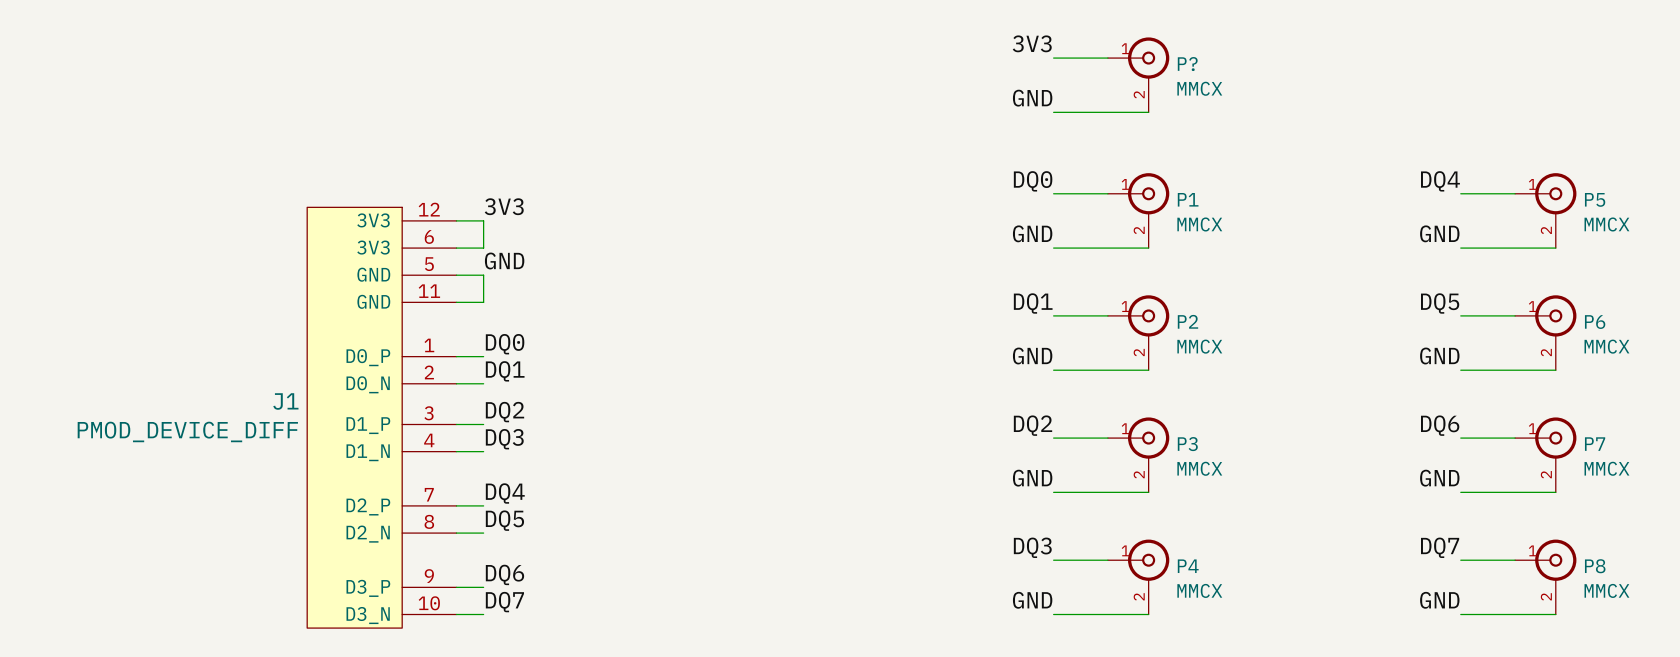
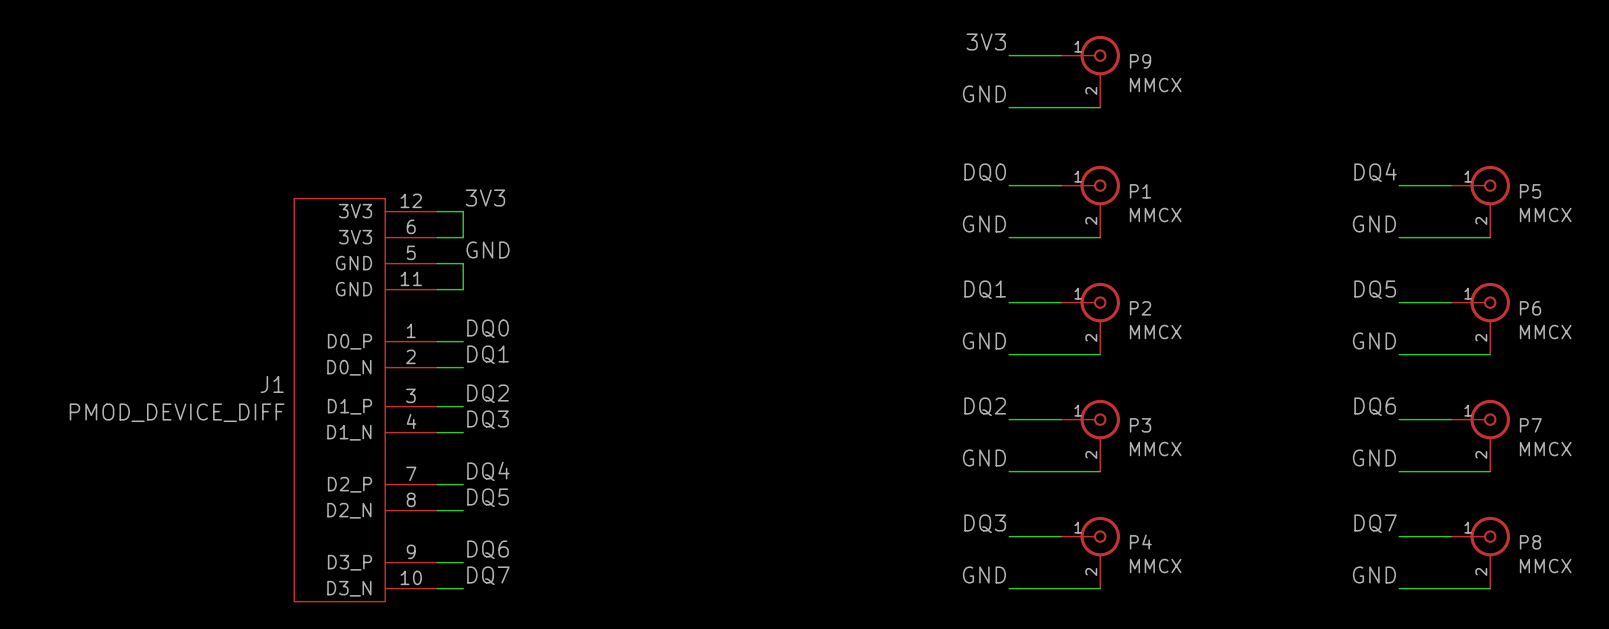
P? name: P? (1187, 64) -> P9 (1140, 61)

